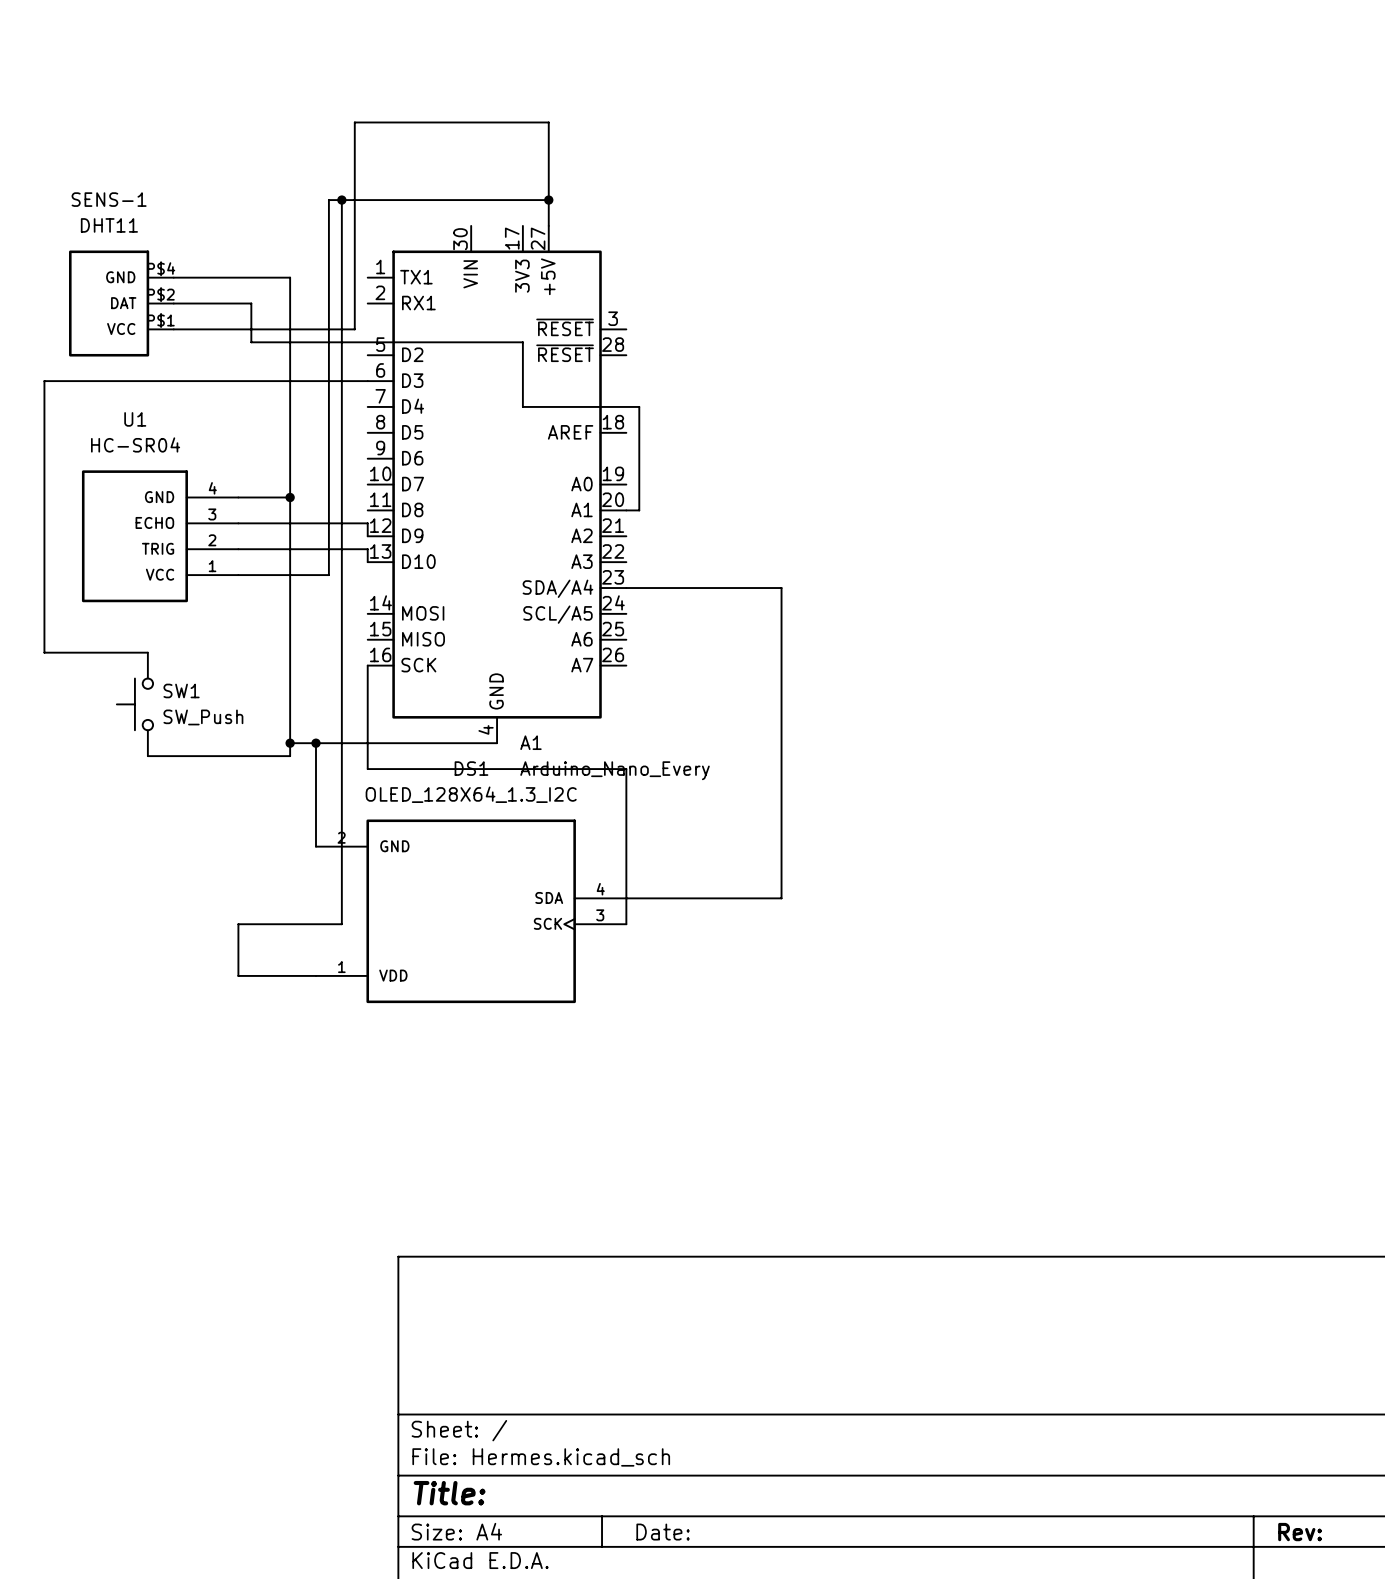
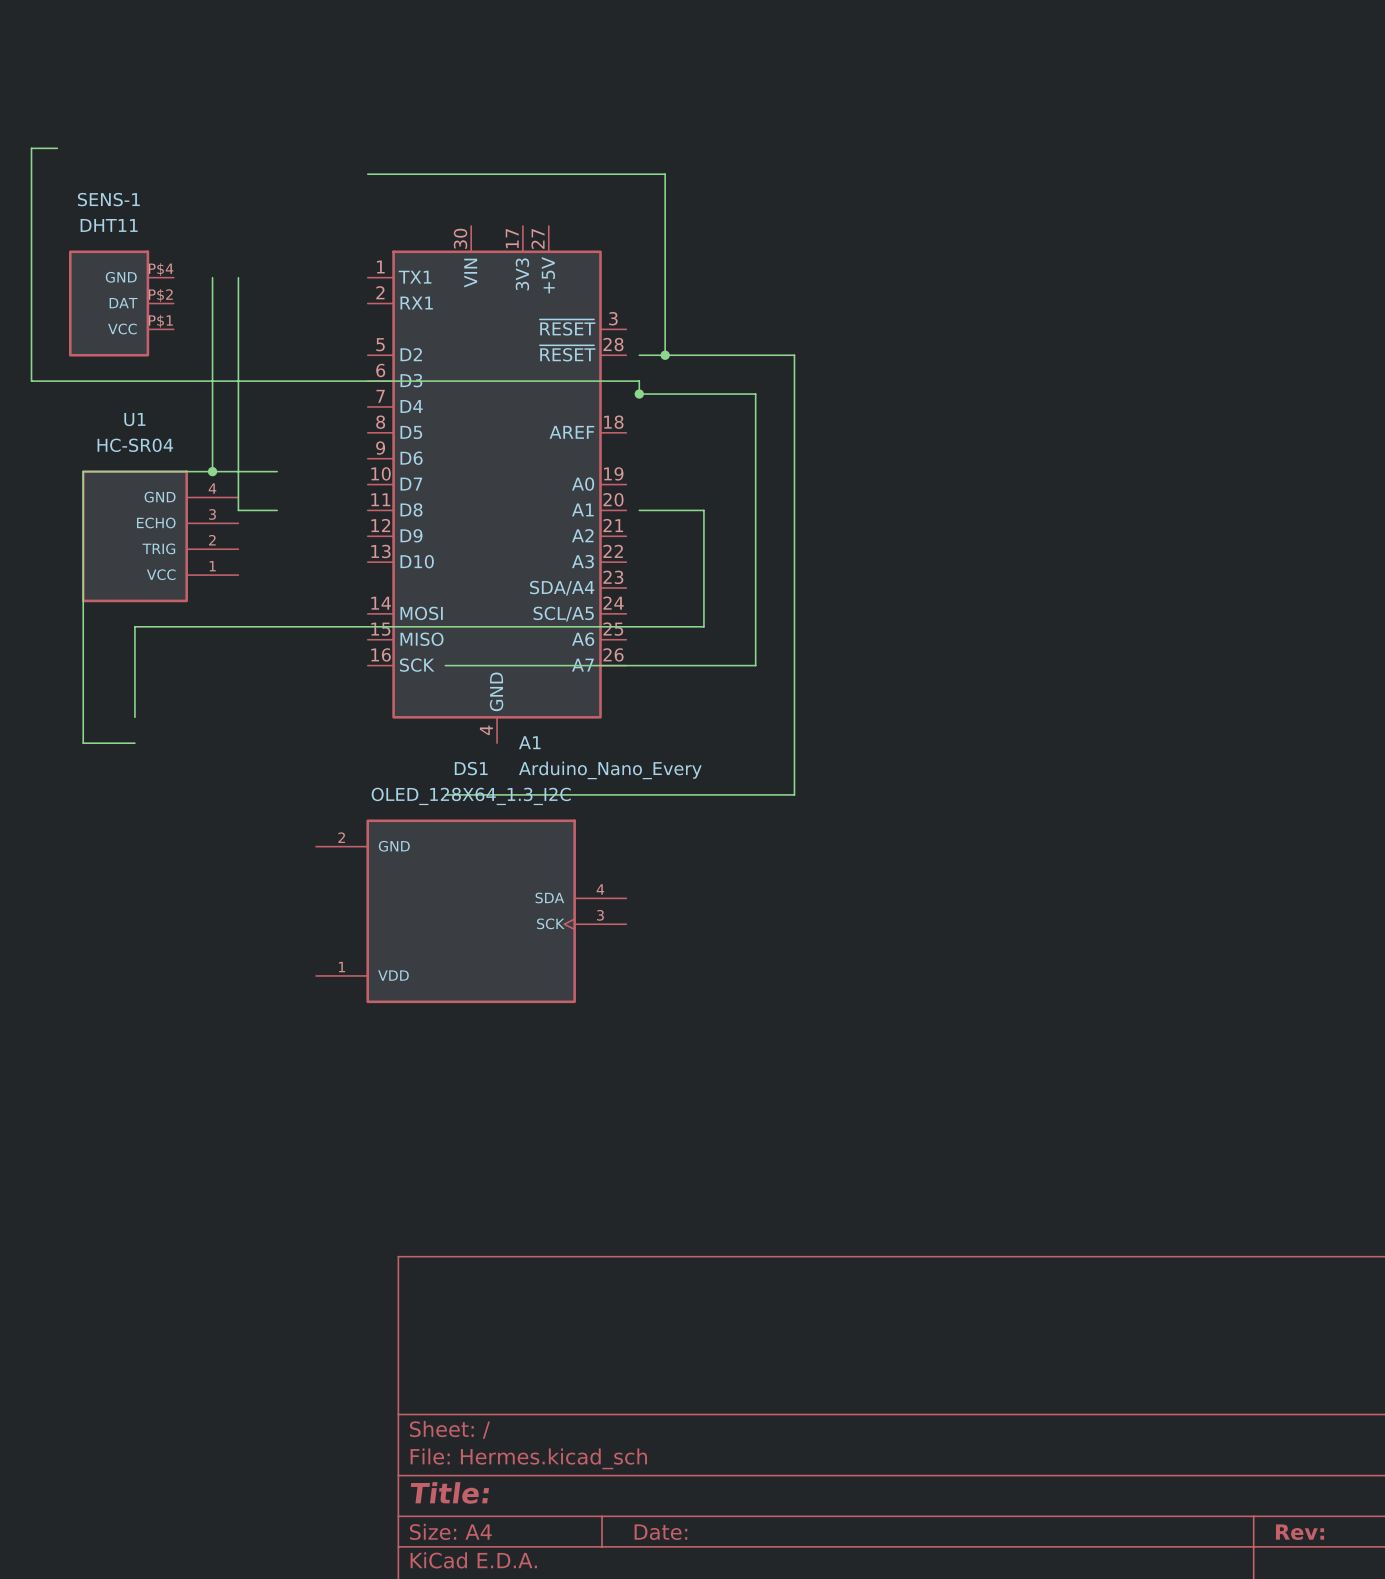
wire: none -> (367, 174) (665, 174) (665, 355)
wire: (341, 200) (341, 924) (238, 924) (238, 975) (316, 975) -> none
junction: (341, 200) -> none
wire: (548, 200) (328, 200) (328, 575) (238, 575) -> none
junction: (548, 200) -> none
wire: (548, 225) (548, 122) (354, 122) (354, 329) (173, 329) -> none
wire: (173, 277) (290, 277) (290, 756) (147, 756) -> none
wire: none -> (212, 277) (212, 471)
wire: none -> (238, 277) (238, 510) (277, 510)
wire: (173, 303) (251, 303) (251, 342) (522, 342) (522, 406) (639, 406) (639, 510) (626, 510) -> none
wire: none -> (639, 355) (794, 355) (794, 794) (445, 794)
junction: none -> (665, 355)
wire: (44, 381) (44, 652) (147, 652) -> (44, 381) (31, 381) (31, 148) (57, 148)
wire: none -> (367, 381) (639, 381) (639, 394) (755, 394) (755, 665) (445, 665)
junction: none -> (639, 394)
junction: none -> (212, 471)
wire: none -> (277, 471) (83, 471) (83, 743) (134, 743)
wire: (238, 497) (290, 497) -> none
junction: (290, 497) -> none
wire: none -> (639, 510) (703, 510) (703, 626) (134, 626) (134, 717)
wire: (238, 523) (367, 523) (367, 536) -> none
wire: (238, 549) (367, 549) (367, 562) -> none
wire: (626, 588) (781, 588) (781, 898) (626, 898) -> none
wire: (367, 665) (367, 769) (626, 769) (626, 924) -> none
SW1: SW_Push (134, 704) -> none
wire: (290, 743) (497, 743) -> none
junction: (290, 743) -> none
wire: (316, 743) (316, 846) -> none
junction: (316, 743) -> none

